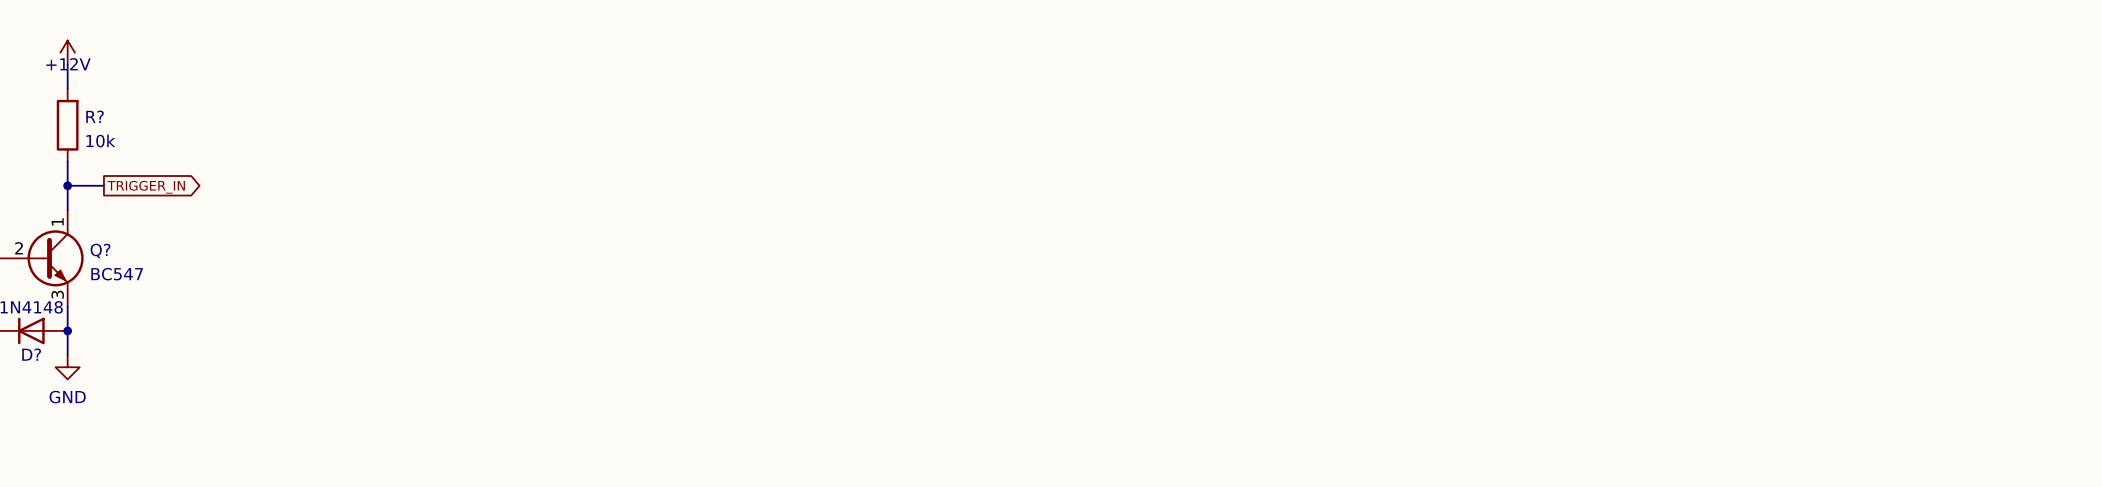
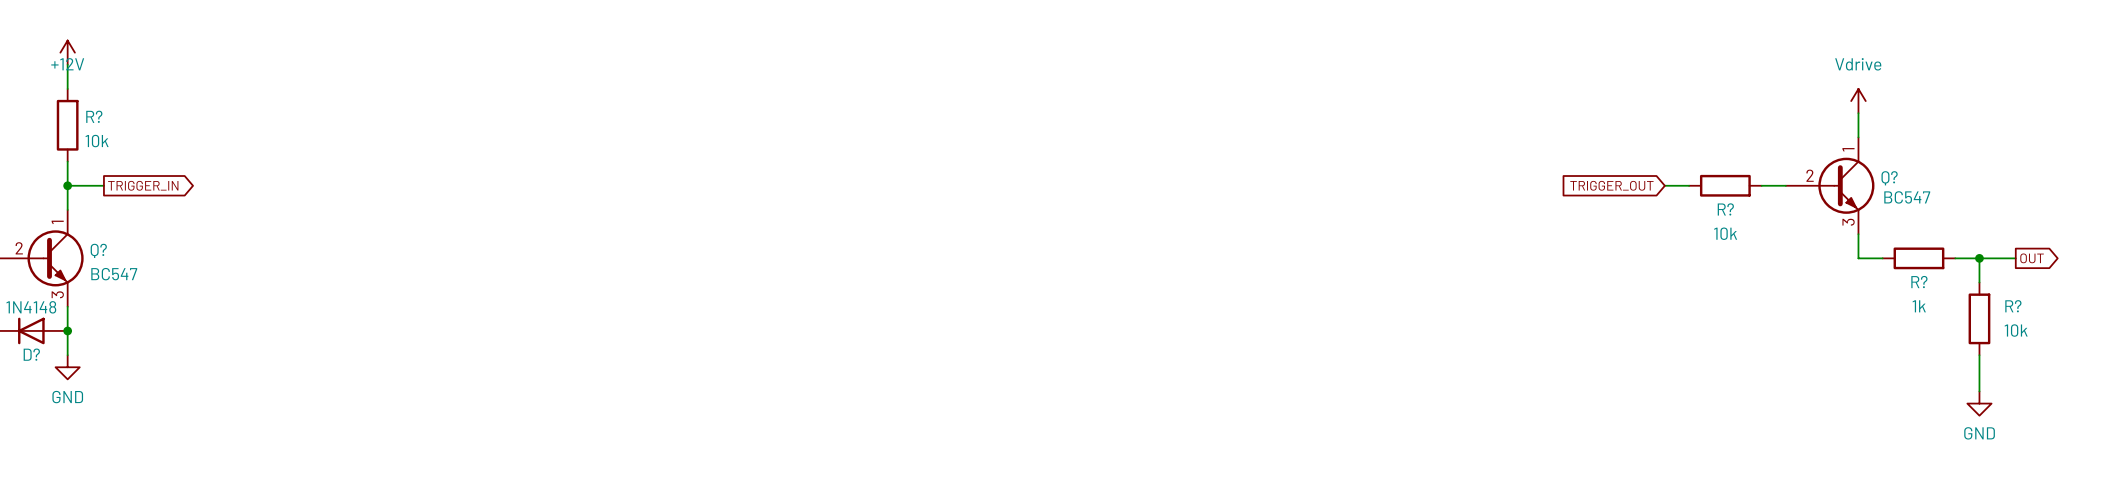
power symbol: none -> Vdrive (1858, 101)
wire: none -> (1858, 113) (1858, 137)
wire: none -> (1664, 185) (1689, 185)
R?: none -> 10k (1725, 185)
wire: none -> (1761, 185) (1785, 185)
Q?: none -> BC547 (1830, 185)
global label: none -> TRIGGER_OUT (1611, 185)
wire: none -> (1858, 234) (1858, 258) (1882, 258)
R?: none -> 1k (1918, 258)
wire: none -> (1955, 258) (2015, 258)
wire: none -> (1979, 258) (1979, 282)
junction: none -> (1979, 258)
global label: none -> OUT (2032, 258)
R?: none -> 10k (1979, 318)
wire: none -> (1979, 355) (1979, 391)
power symbol: none -> GND (1979, 403)

